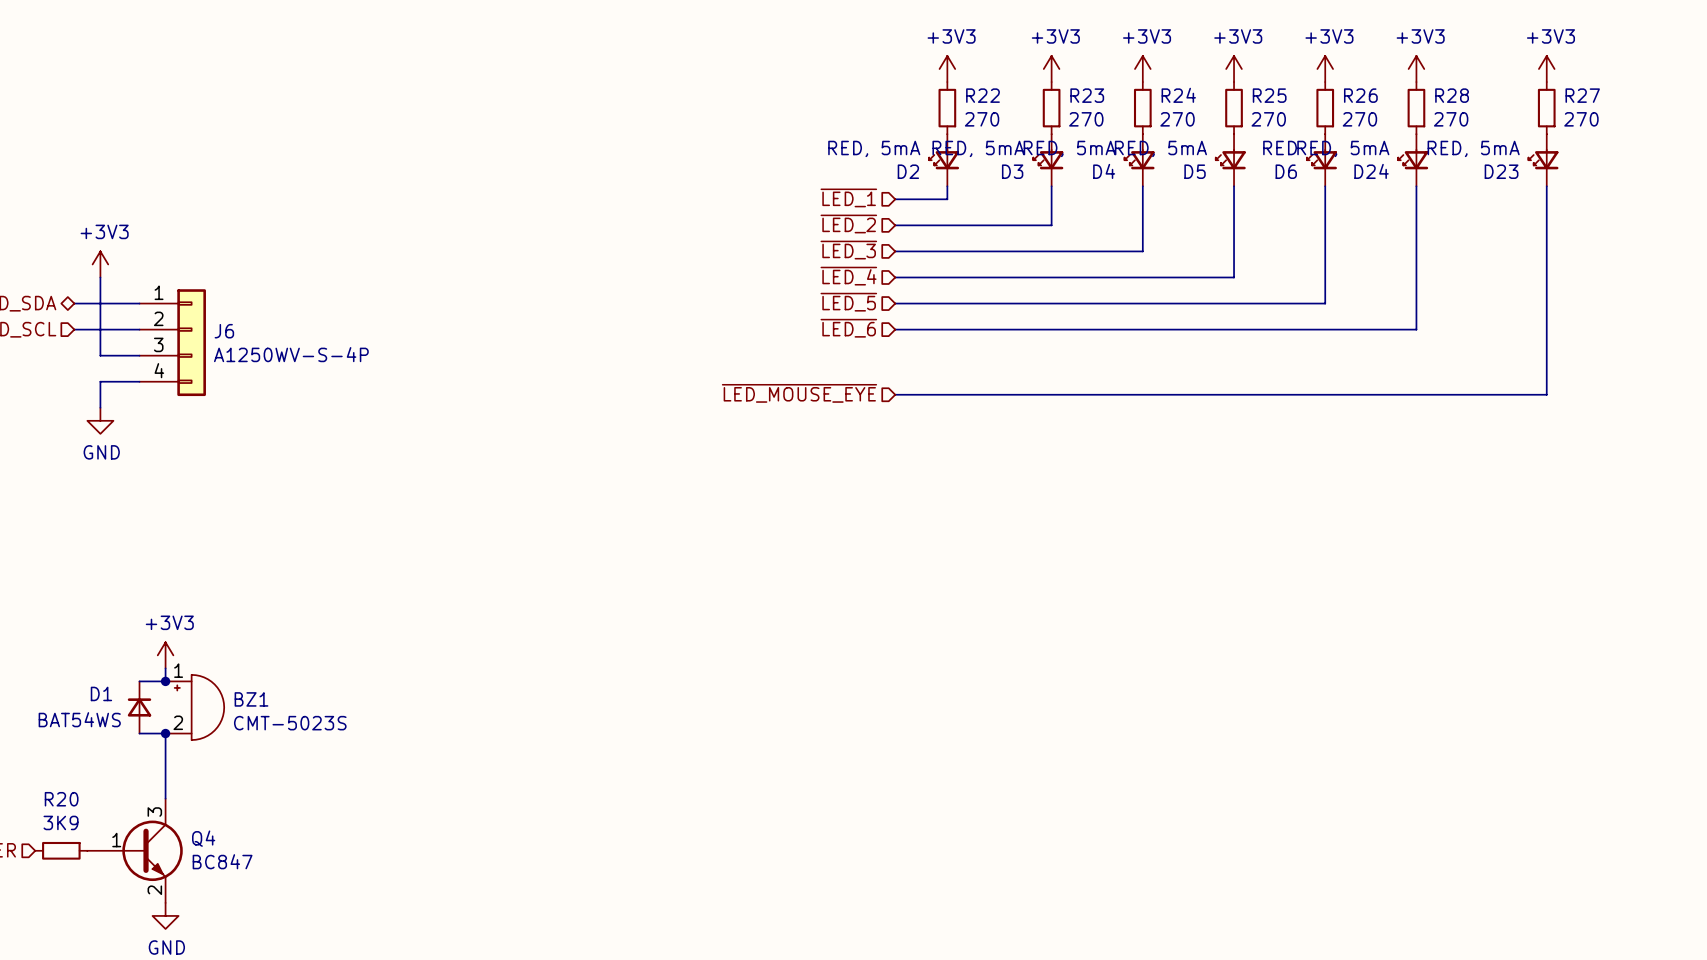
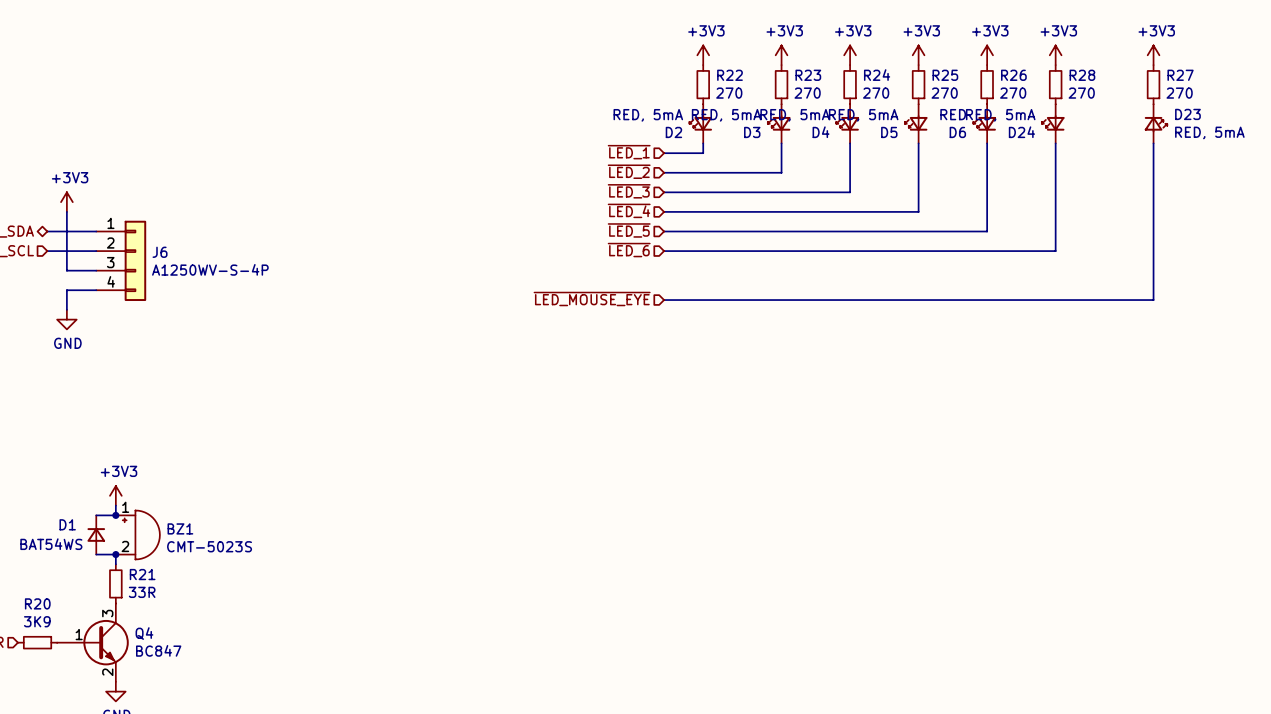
D23 rotation: 0° (1543, 159) -> 180° (1155, 124)
wire: (165, 746) (165, 798) -> none
R21: none -> 33R (115, 583)

